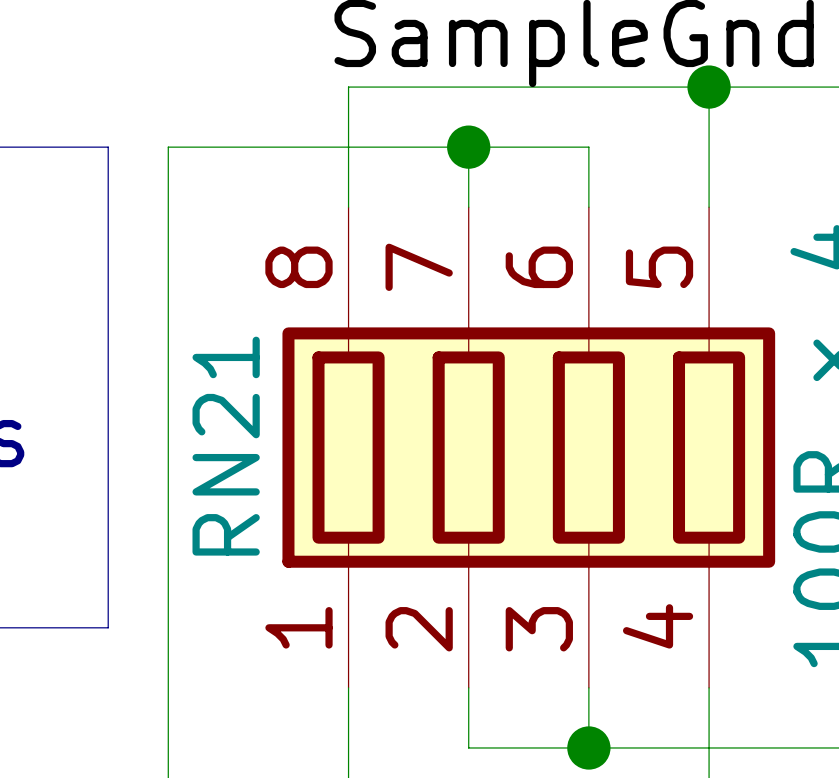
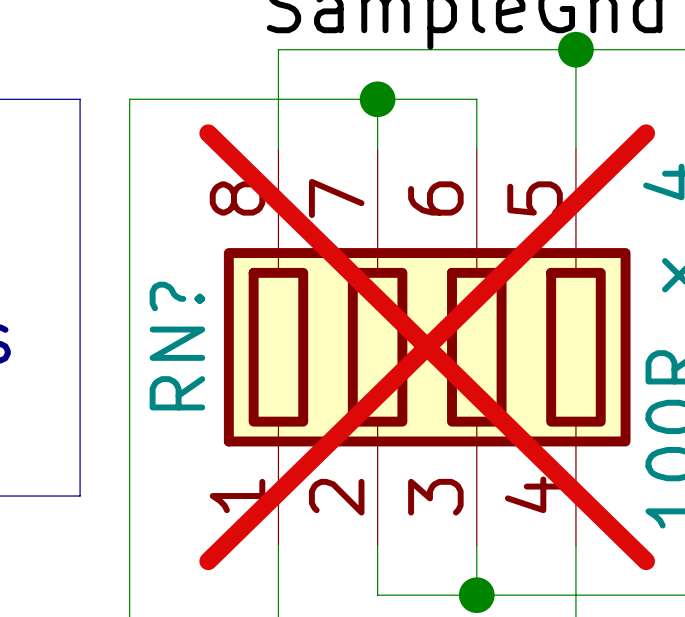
RN21 name: RN21 (226, 446) -> RN? (177, 346)
RN21 do-not-place cross: none -> (427, 347)

